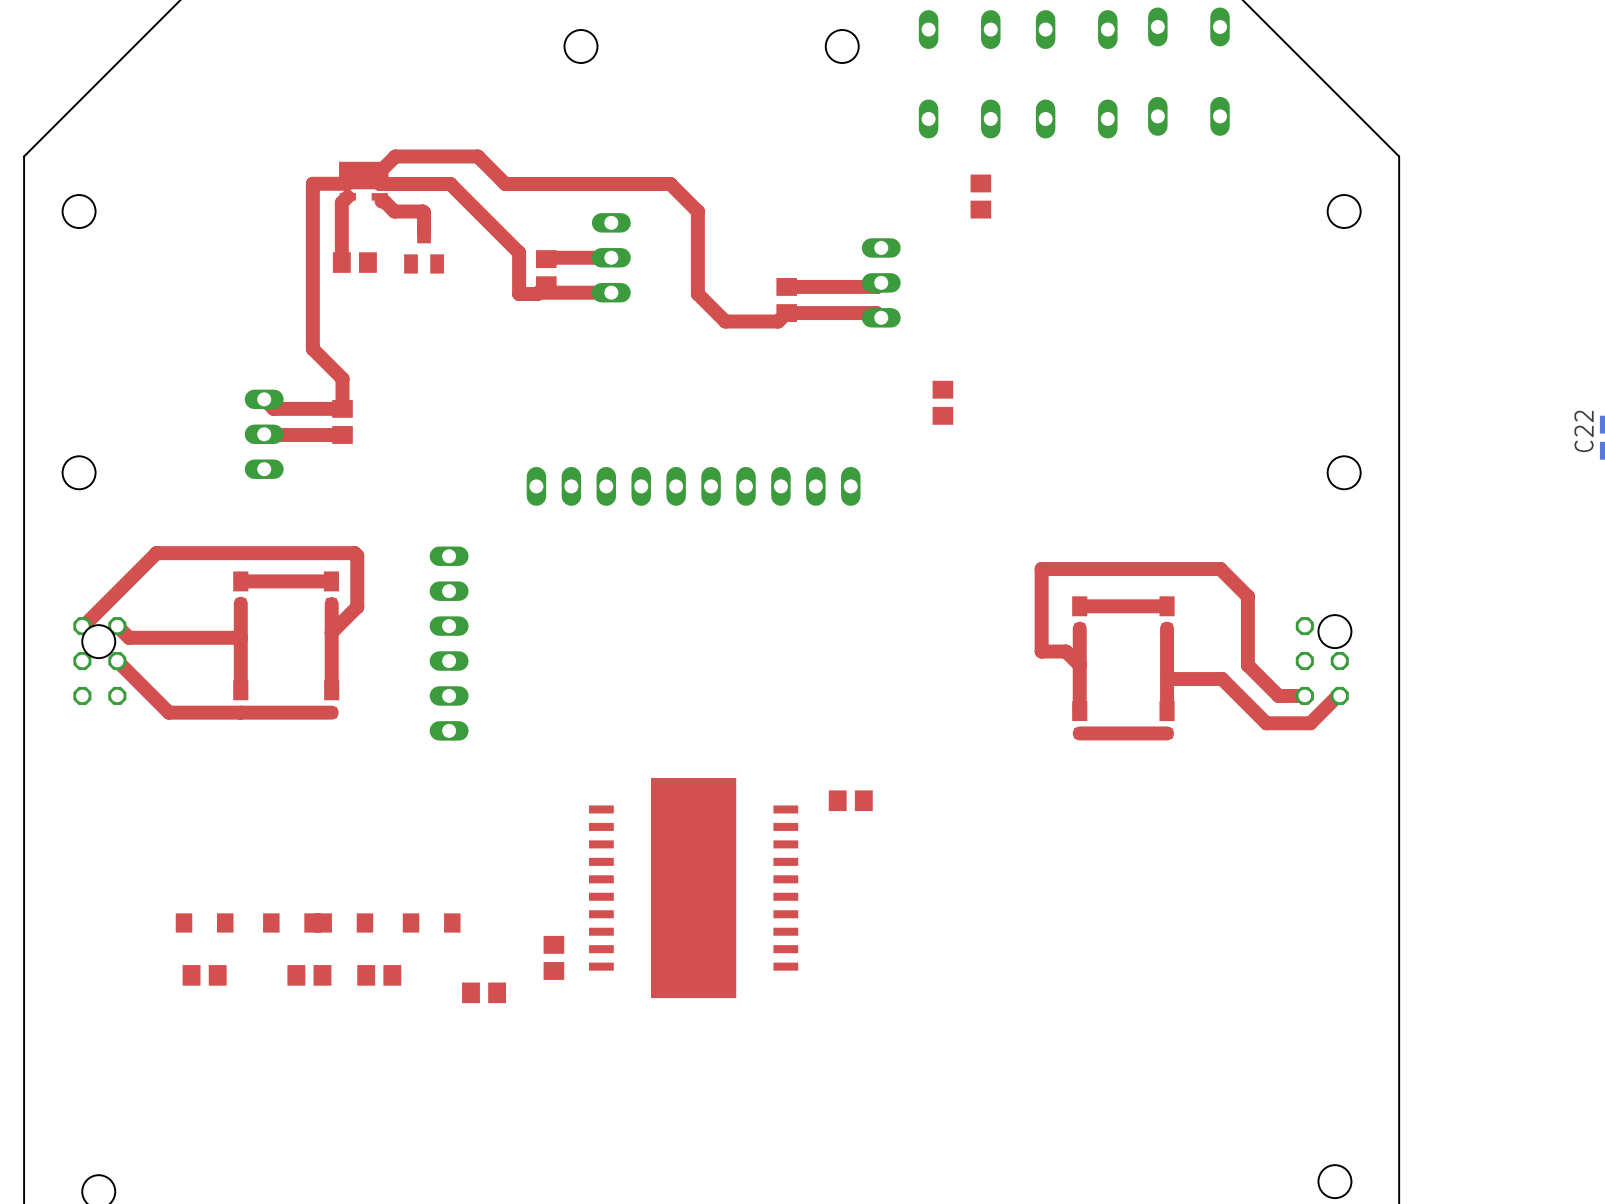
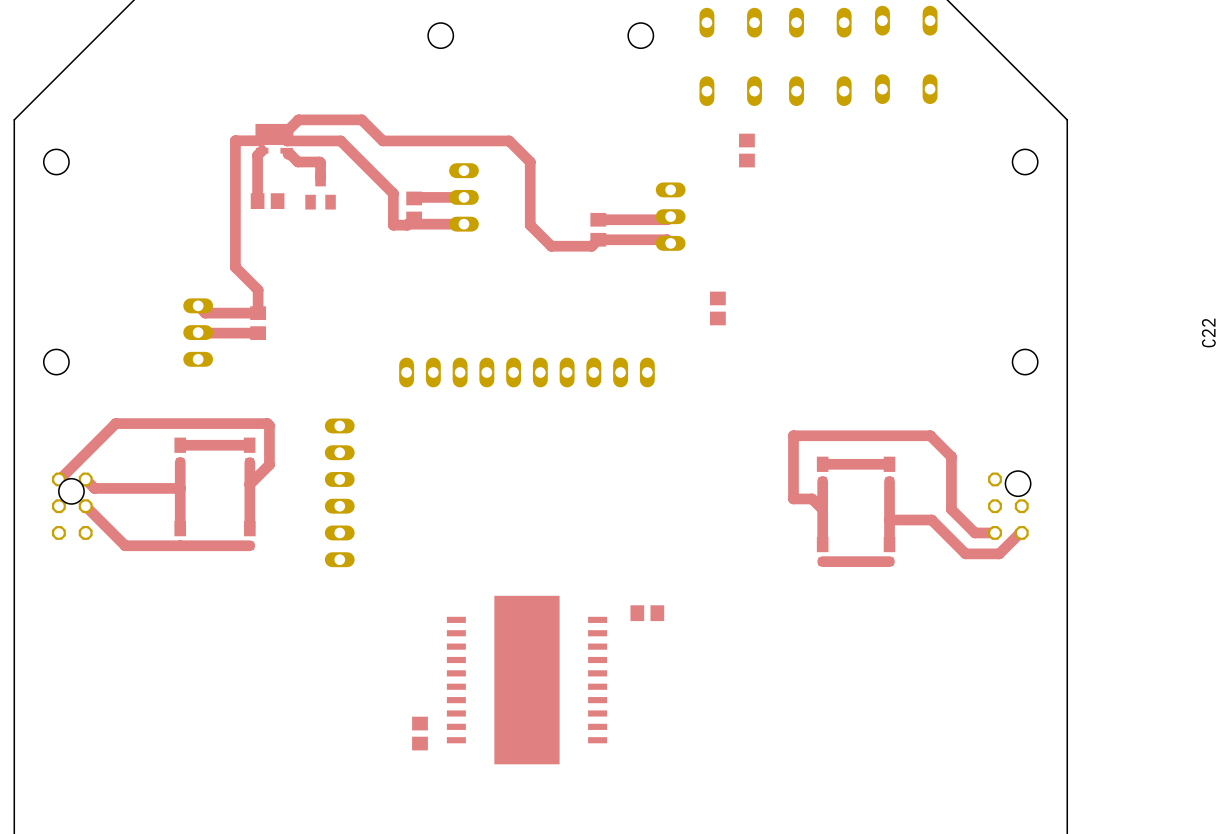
part: (204, 922) -> none
part: (291, 922) -> none
part: (344, 922) -> none
part: (431, 922) -> none
part: (204, 975) -> none
part: (309, 975) -> none
part: (379, 975) -> none
part: (484, 992) -> none

